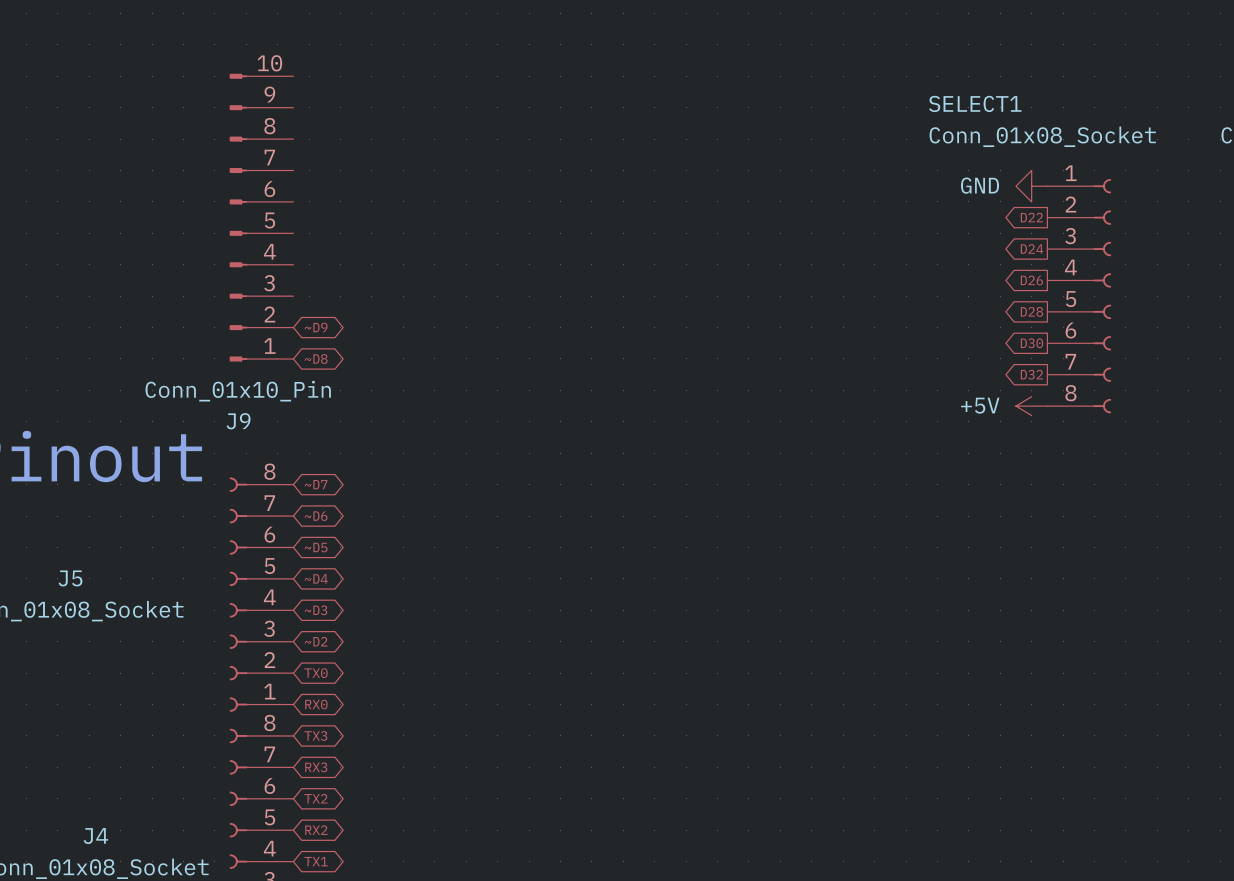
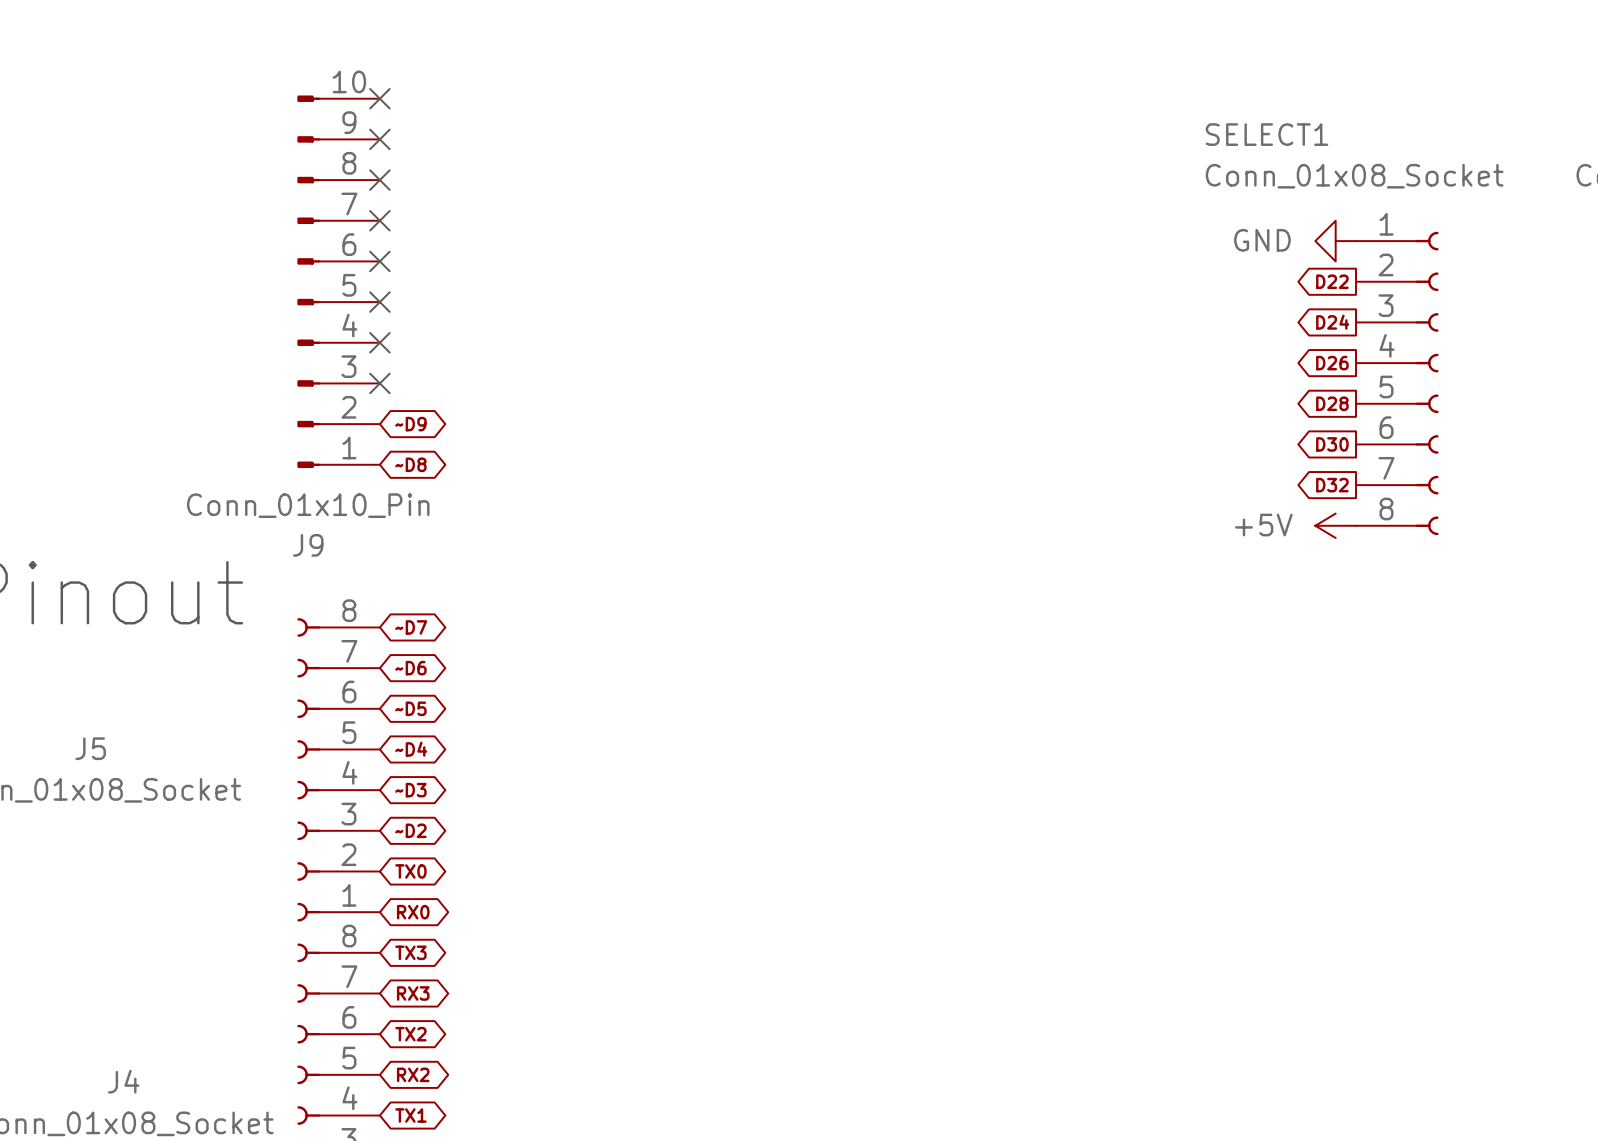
no-connect mark: none -> (379, 98)
no-connect mark: none -> (379, 139)
no-connect mark: none -> (379, 180)
no-connect mark: none -> (379, 220)
no-connect mark: none -> (379, 261)
no-connect mark: none -> (379, 302)
no-connect mark: none -> (379, 342)
no-connect mark: none -> (379, 383)

